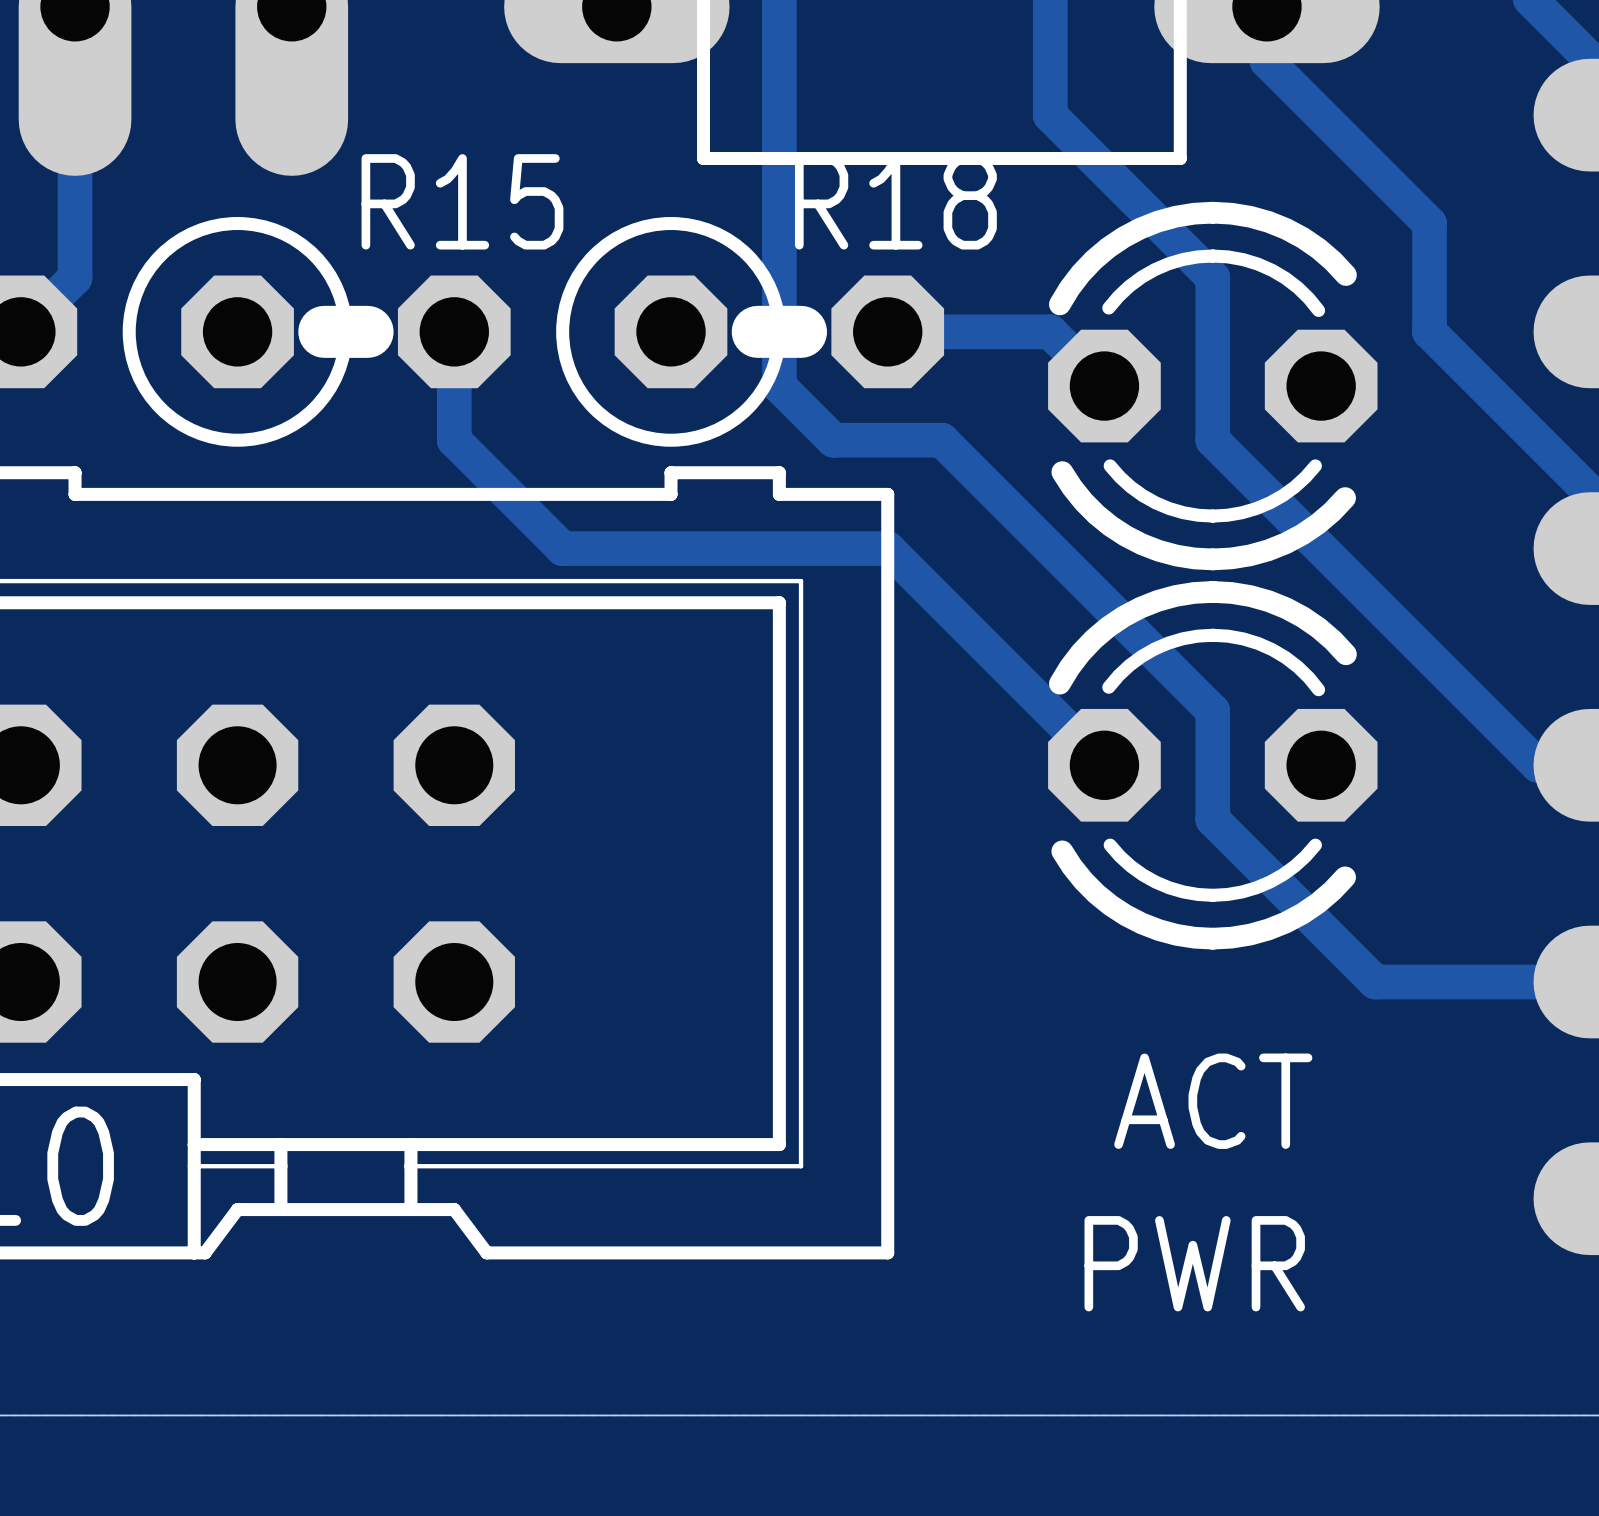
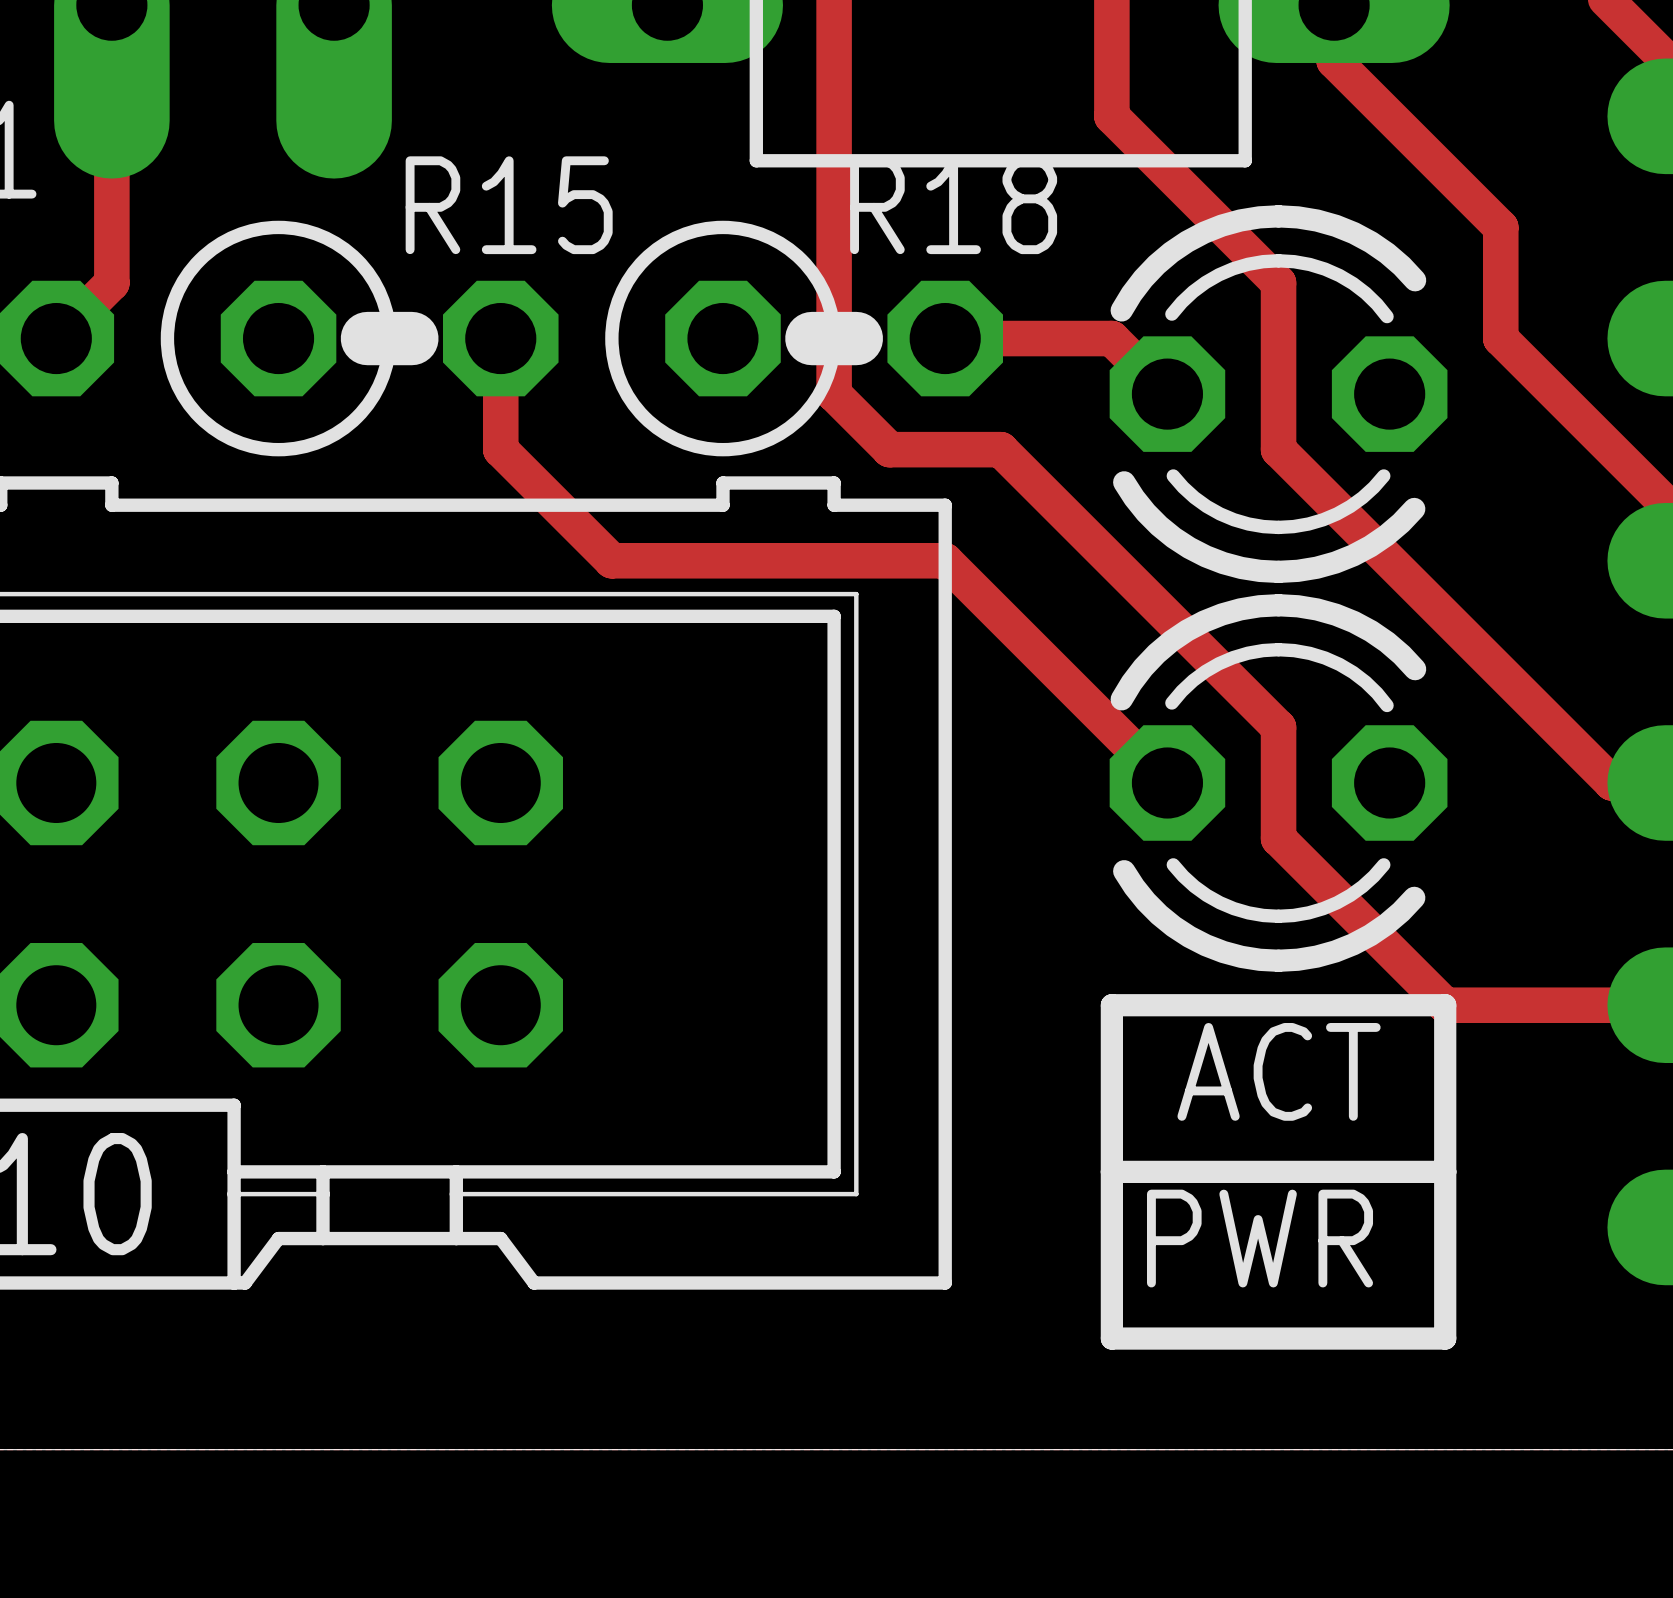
line: none -> (1111, 1005) (1445, 1005) (1445, 1338) (1111, 1338) (1111, 1005)
part value position: ACT (1213, 1101) -> ACT (1279, 1071)
line: none -> (1111, 1171) (1445, 1171)
part value position: PWR (1194, 1263) -> PWR (1260, 1238)

